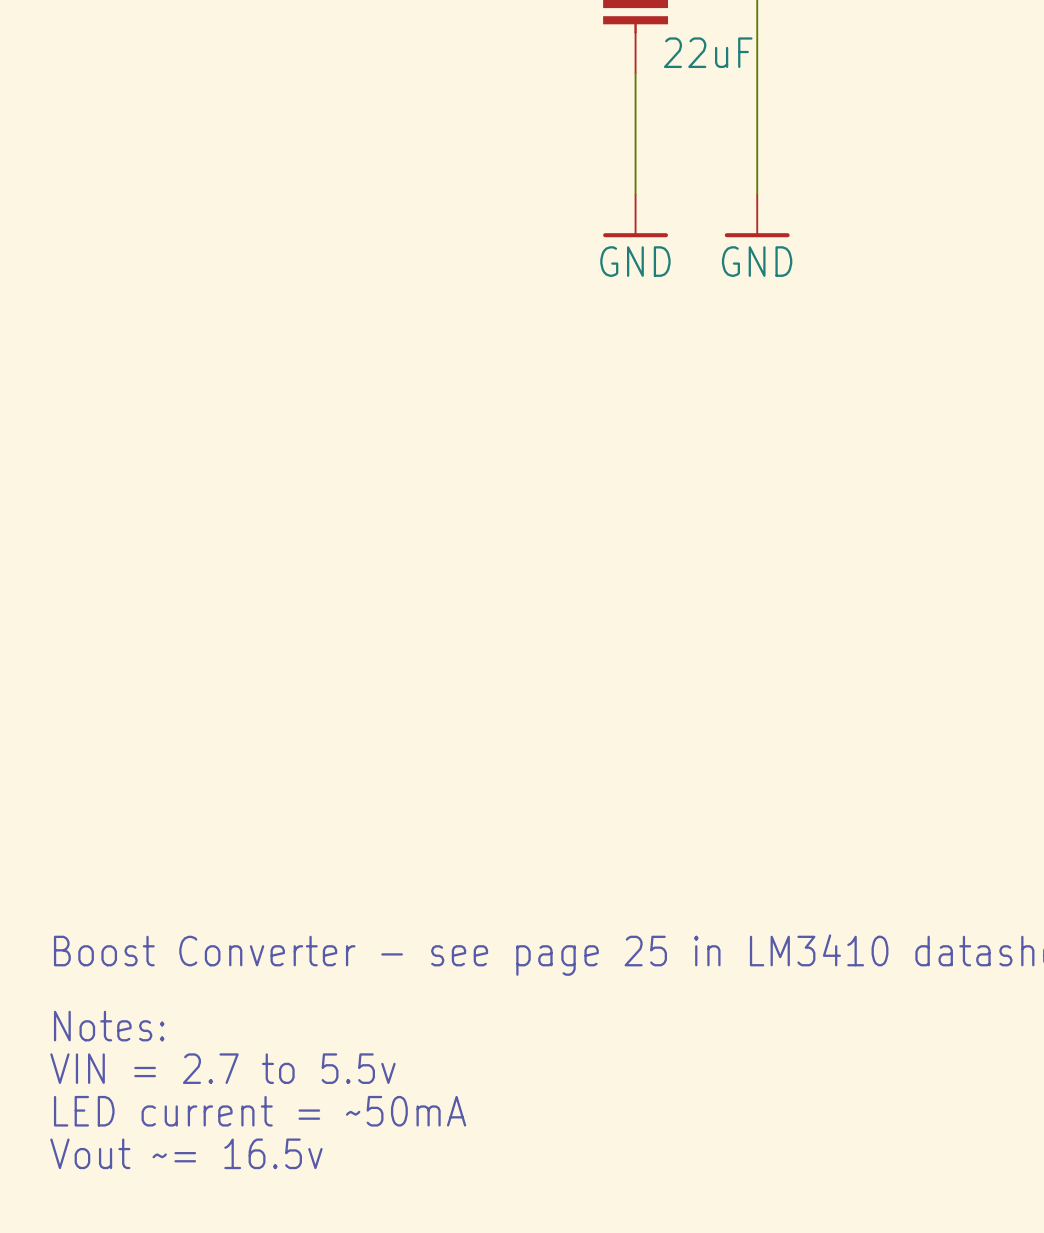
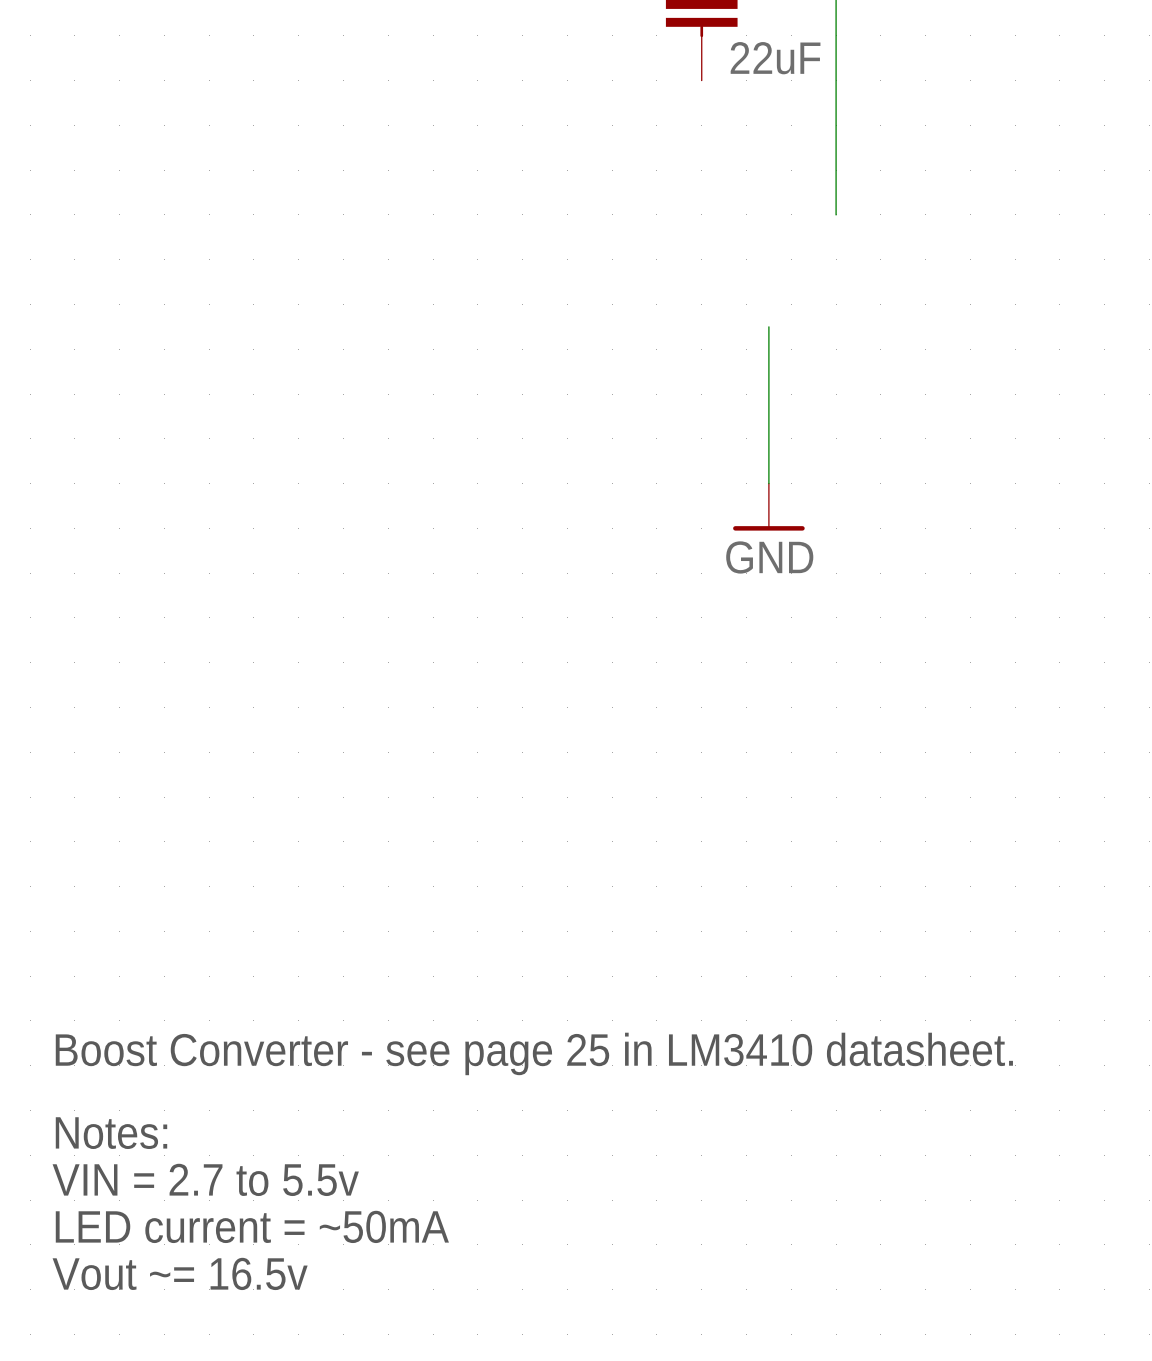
wire: (635, 72) (635, 194) -> none
power symbol: GND (635, 215) -> none
power symbol: GND (757, 215) -> none
wire: none -> (768, 326) (768, 483)
power symbol: none -> GND (768, 507)

